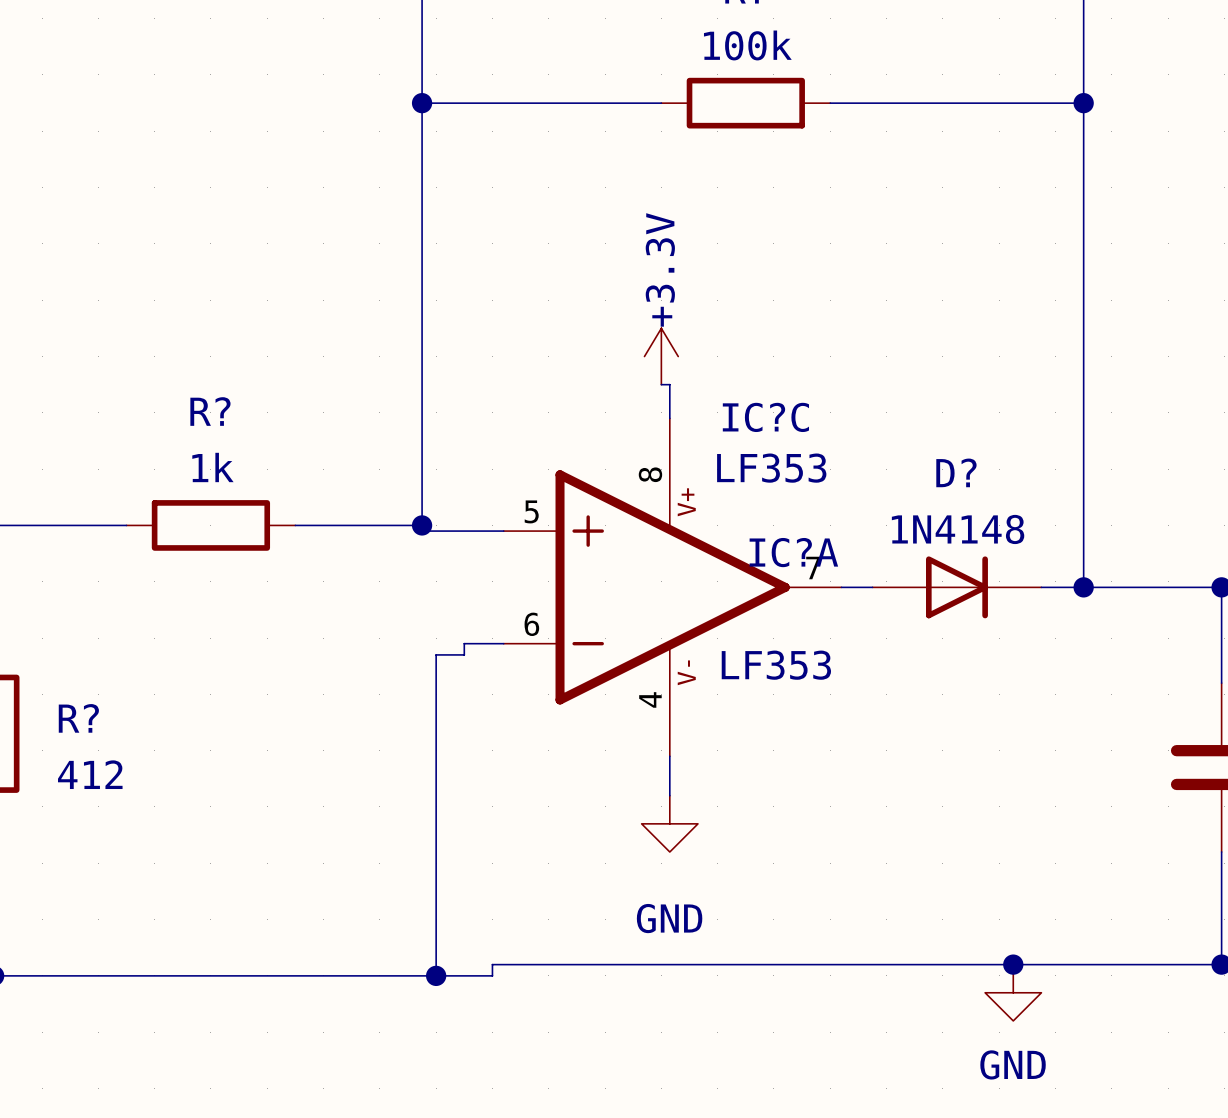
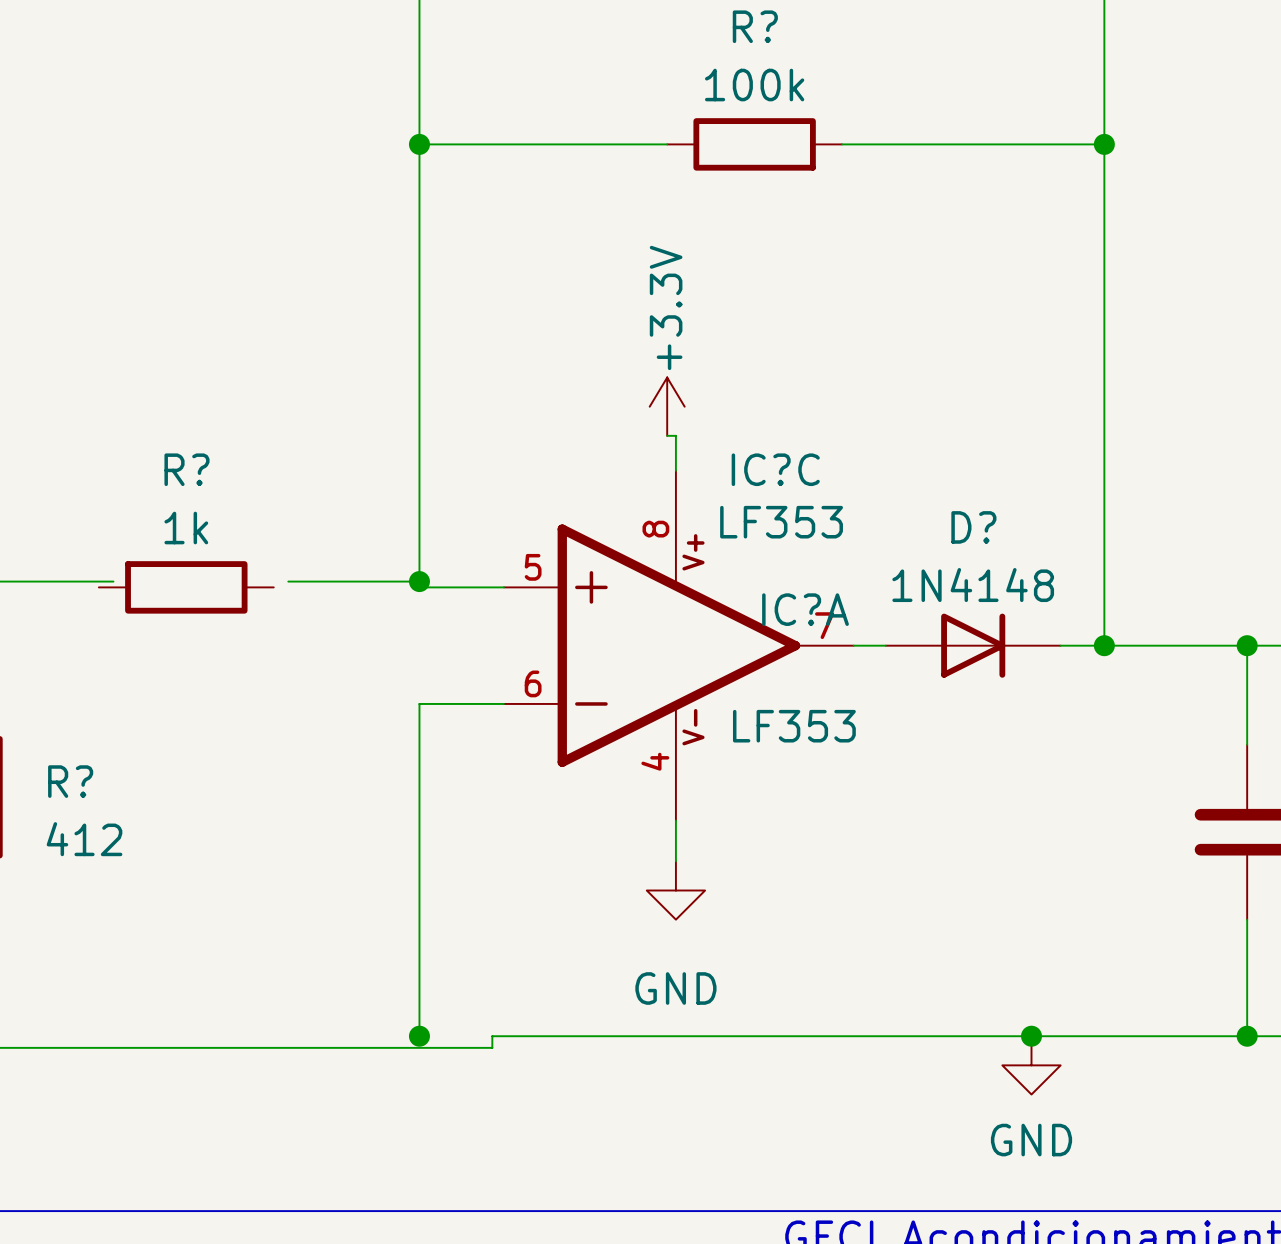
R? position: (210, 525) -> (186, 587)
wire: (464, 643) (464, 654) (436, 654) (436, 975) -> (463, 703) (419, 703) (419, 1036)
junction position: (436, 975) -> (419, 1036)

